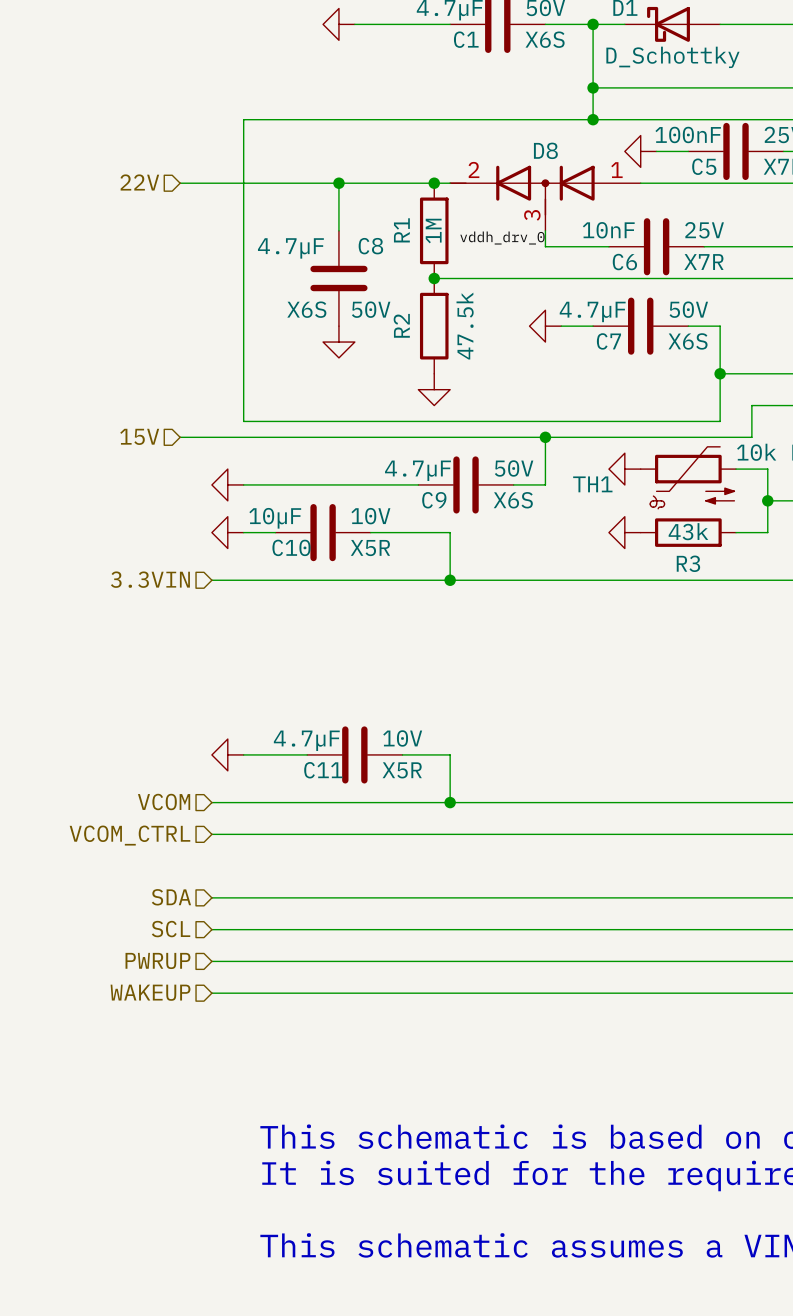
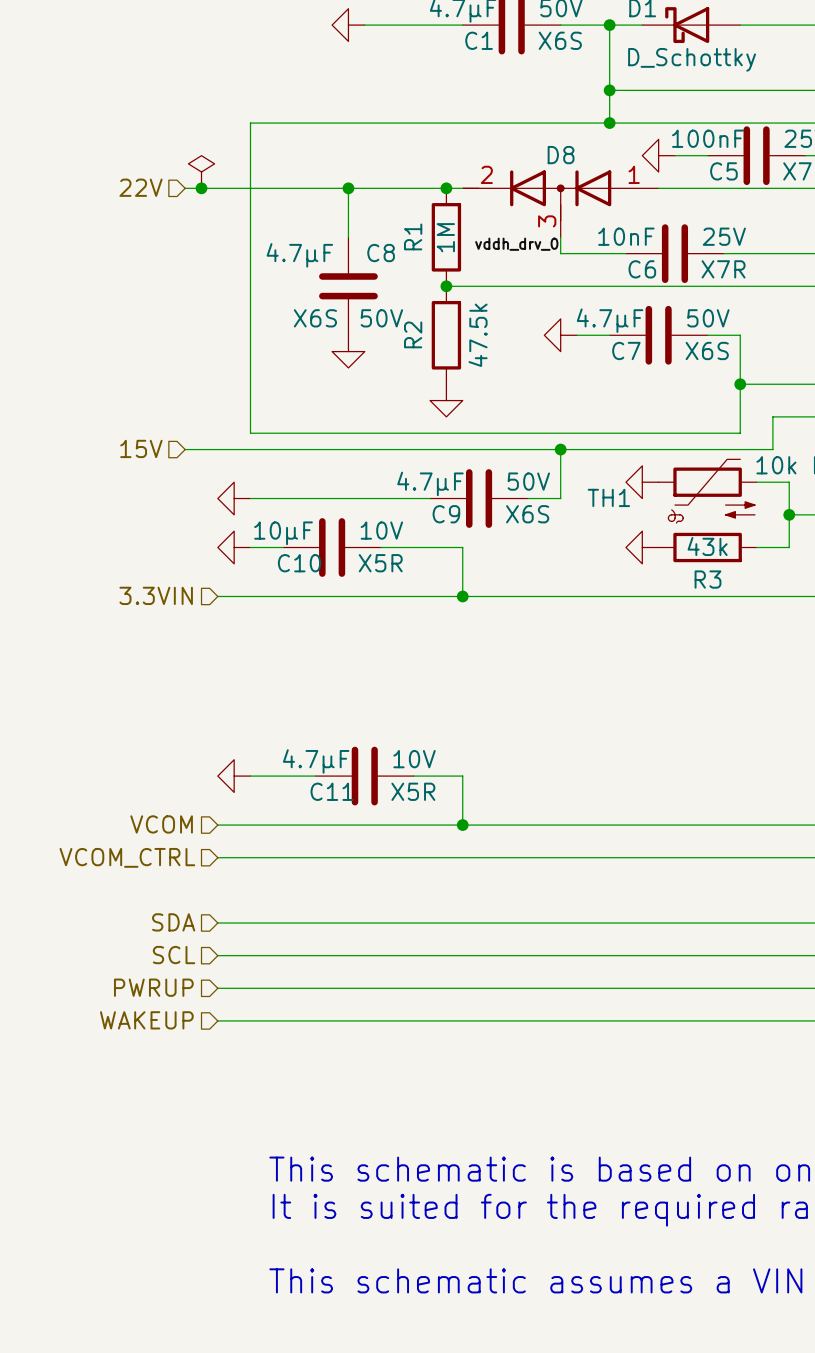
power symbol: none -> (201, 172)
junction: none -> (201, 188)

